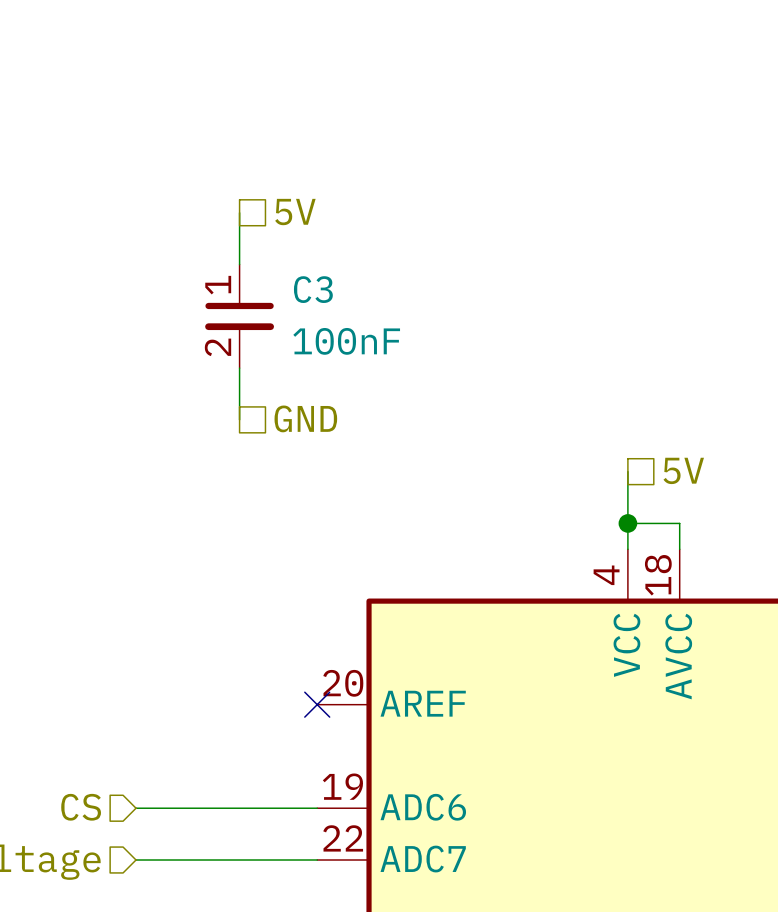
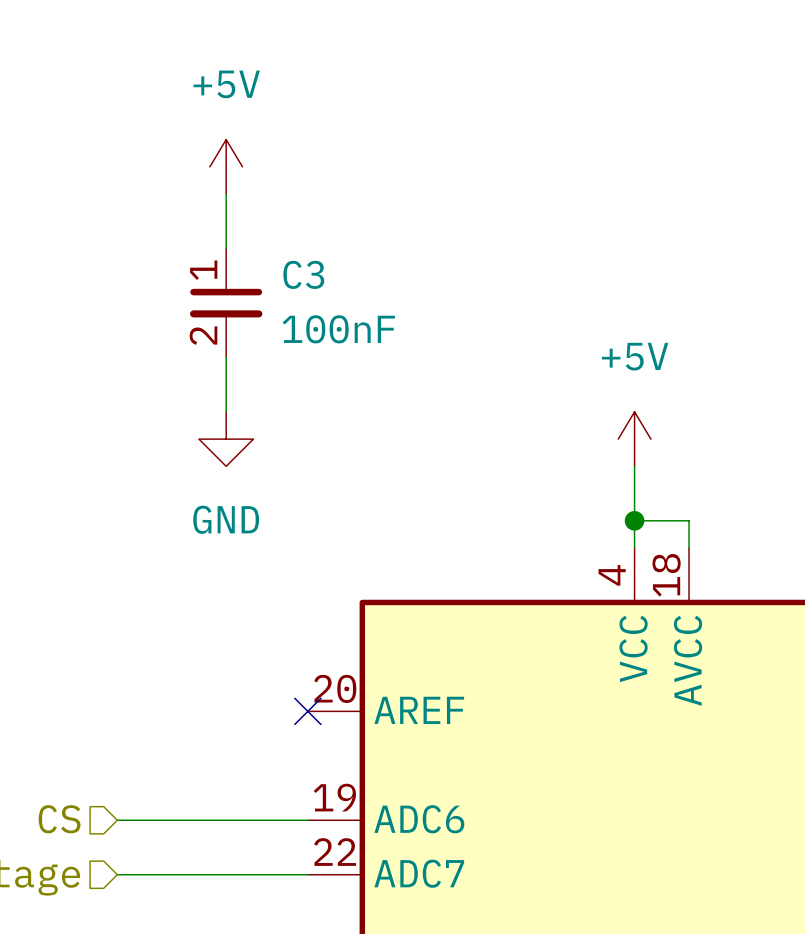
power symbol: none -> +5V (226, 166)
hierarchical label: 5V (295, 212) -> none
hierarchical label: GND (305, 418) -> none
power symbol: none -> GND (226, 439)
power symbol: none -> +5V (634, 439)
hierarchical label: 5V (683, 470) -> none

